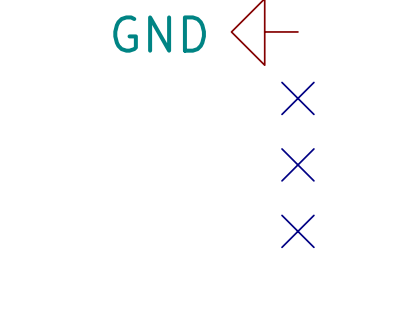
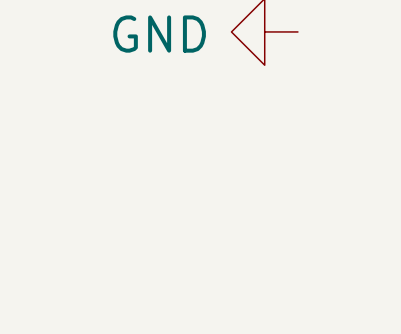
no-connect mark: (297, 98) -> none
no-connect mark: (297, 164) -> none
no-connect mark: (297, 231) -> none

